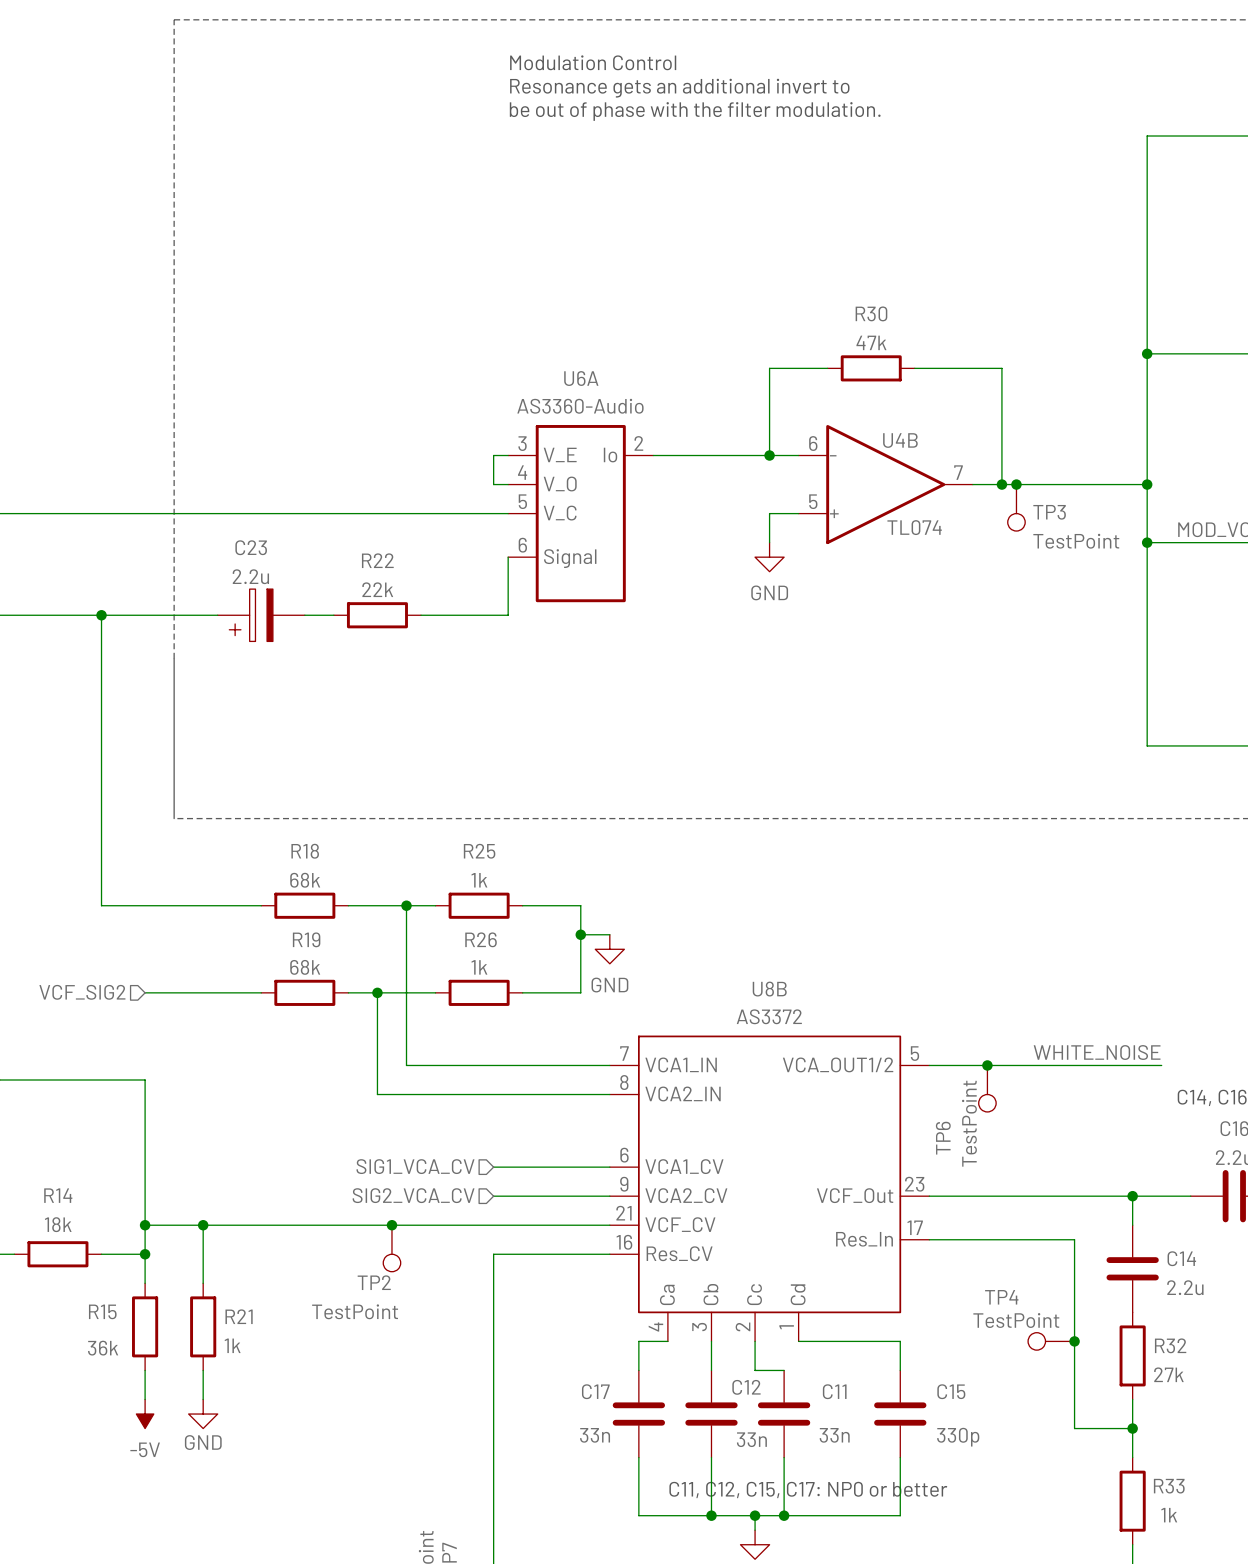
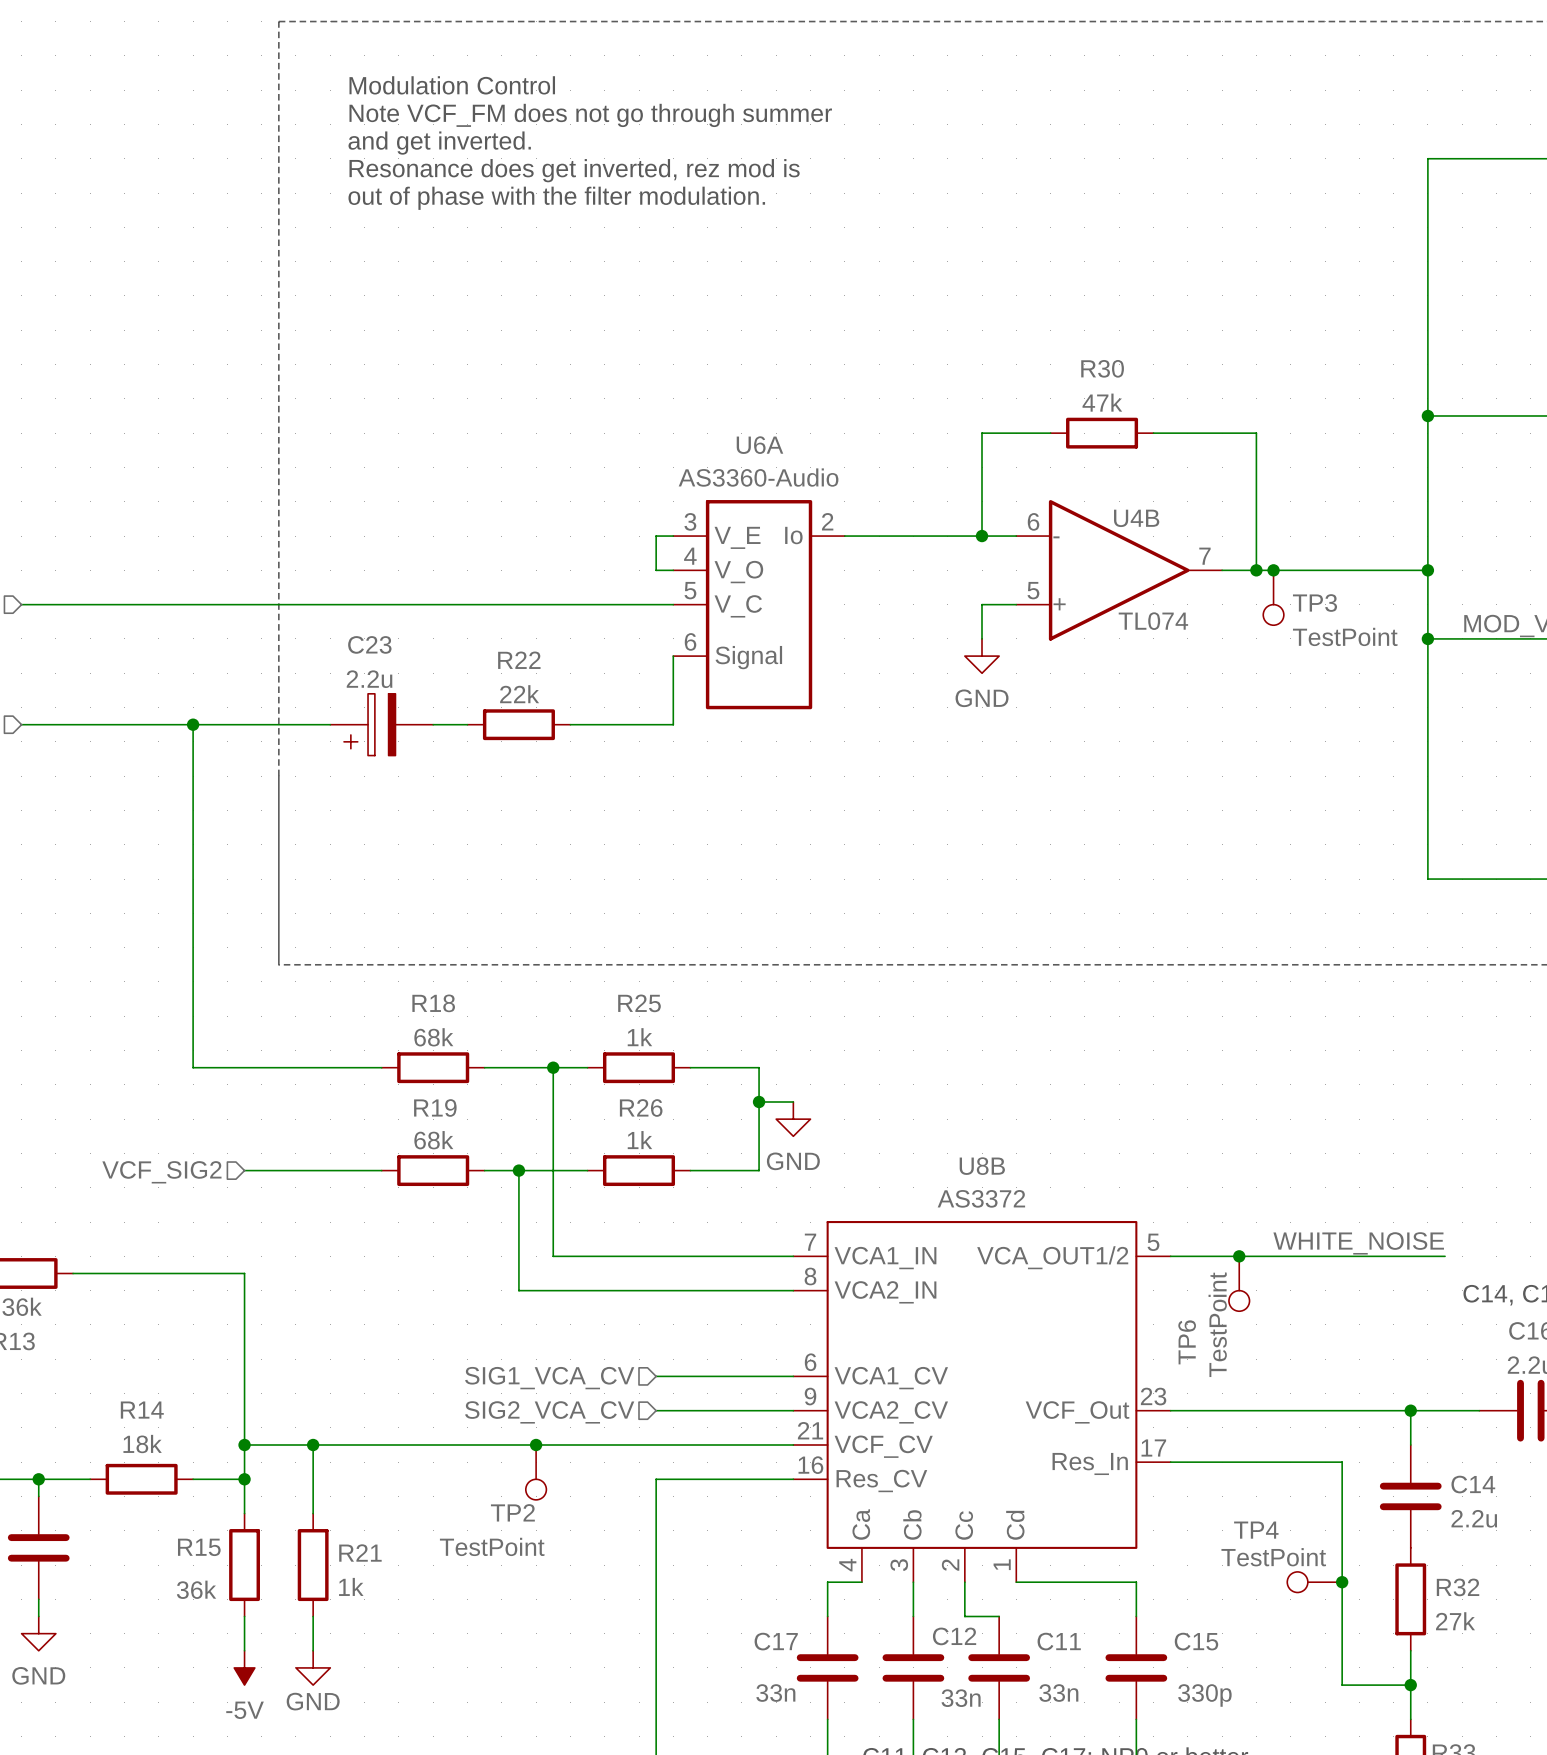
text position: Modulation Control (593, 62) -> Modulation Control (452, 85)
text: Resonance gets an additional invert to (679, 88) -> none
text: none -> Note VCF_FM does not go through summer (590, 115)
text: be out of phase with the filter modulation. (695, 111) -> none
text: none -> and get inverted. (439, 143)
text: none -> Resonance does get inverted, rez mod is (574, 170)
text: none -> out of phase with the filter modulation. (556, 198)

